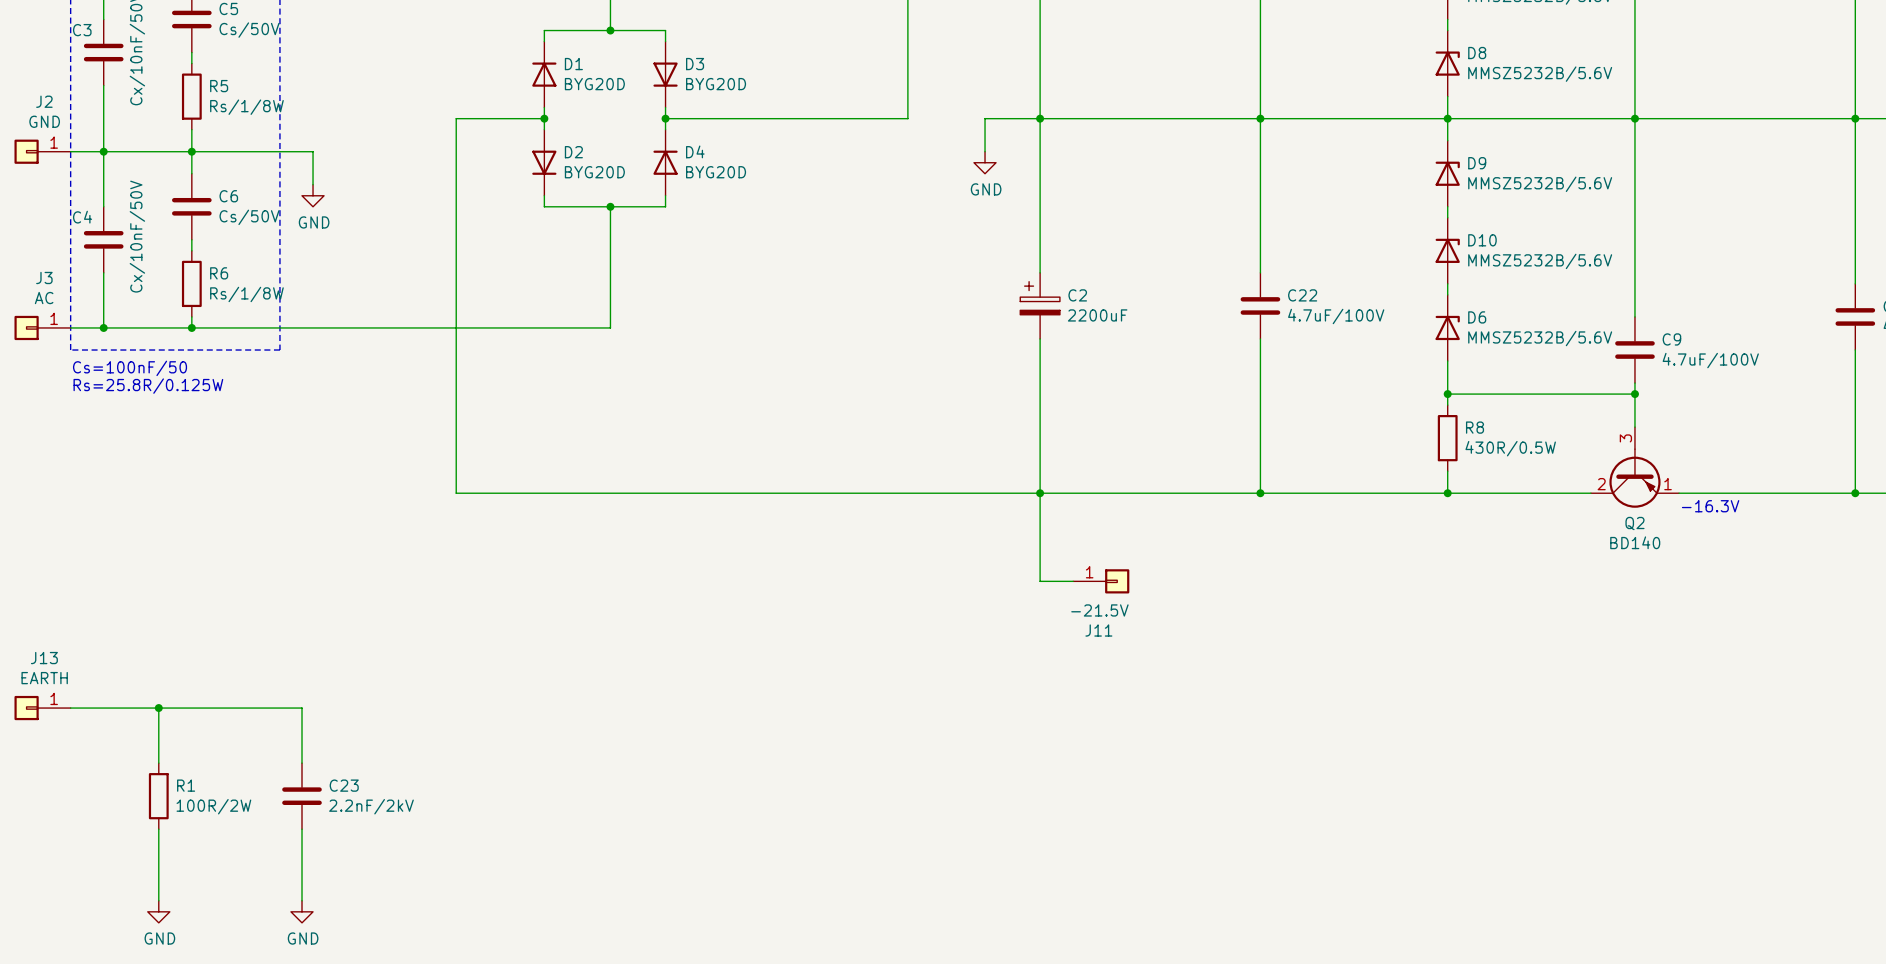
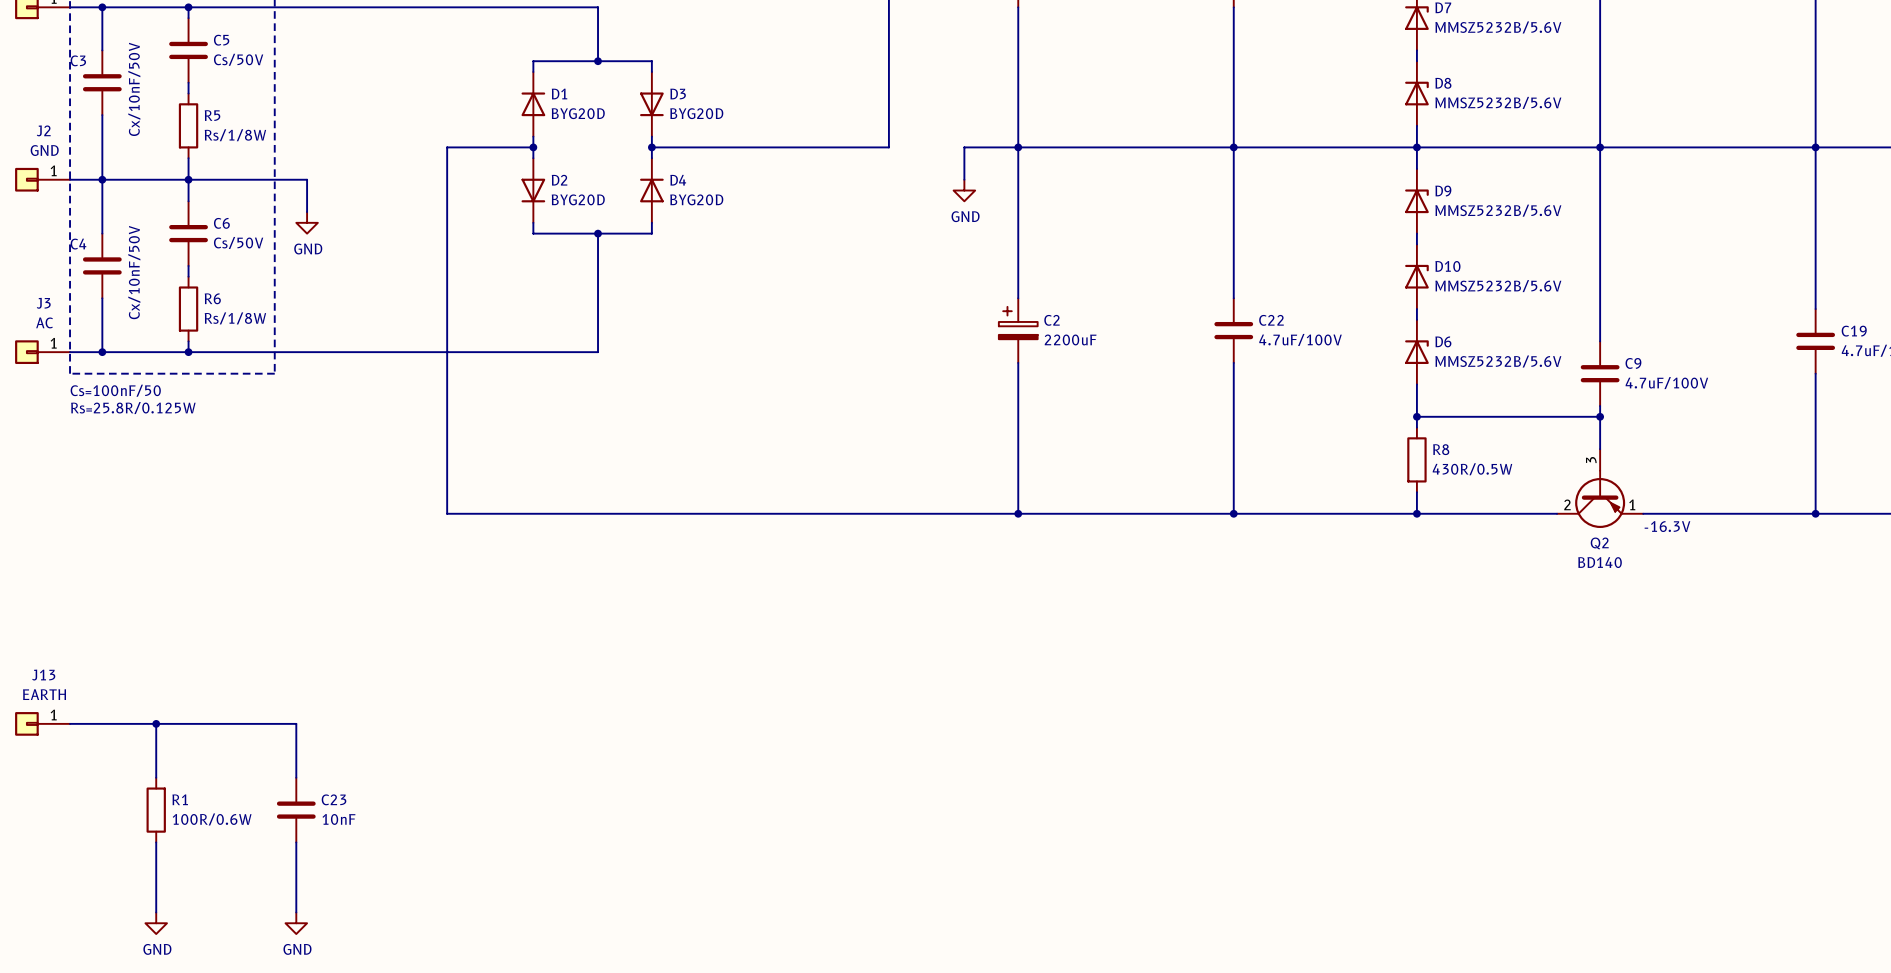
wire: (1040, 493) (1040, 581) (1073, 581) -> none
J11: -21.5V (1101, 581) -> none
R1 value: 100R/2W (213, 806) -> 100R/0.6W (212, 819)
C23 value: 2.2nF/2kV (371, 806) -> 10nF (338, 819)

